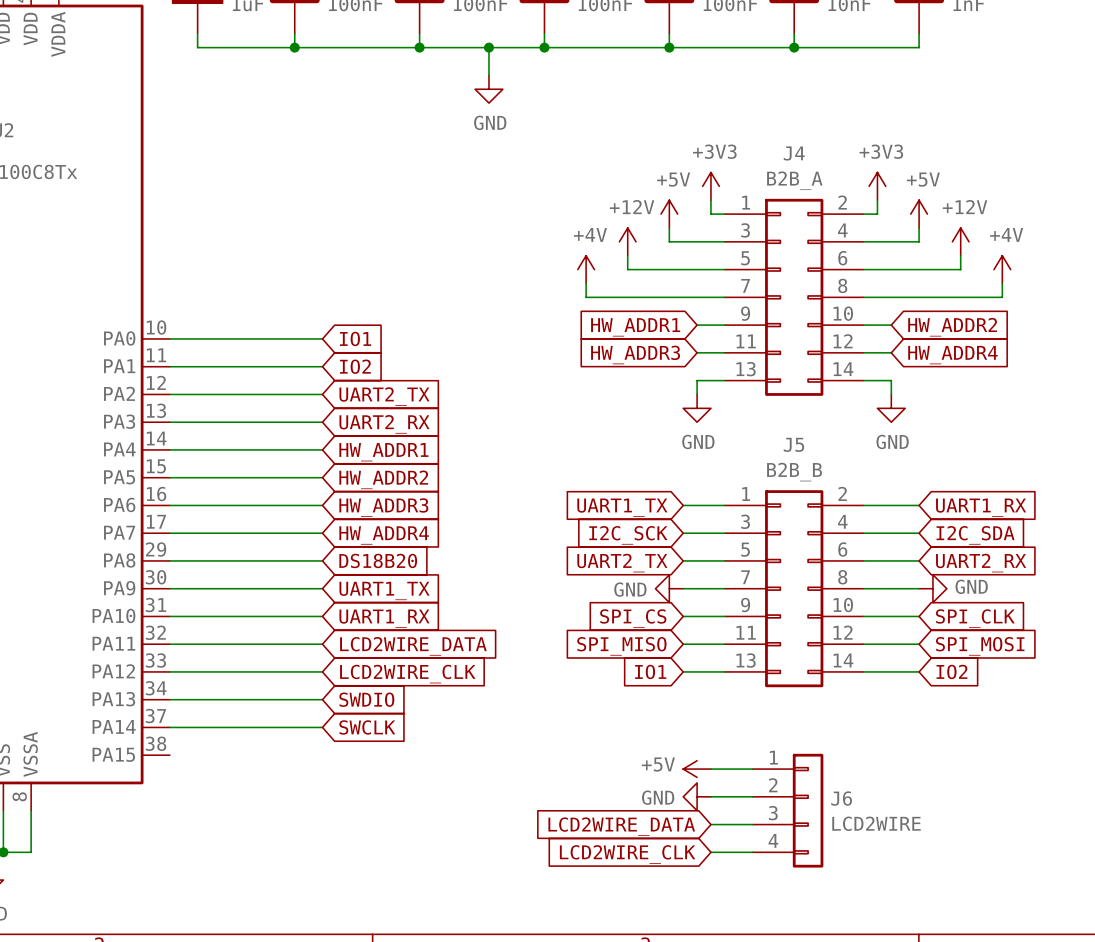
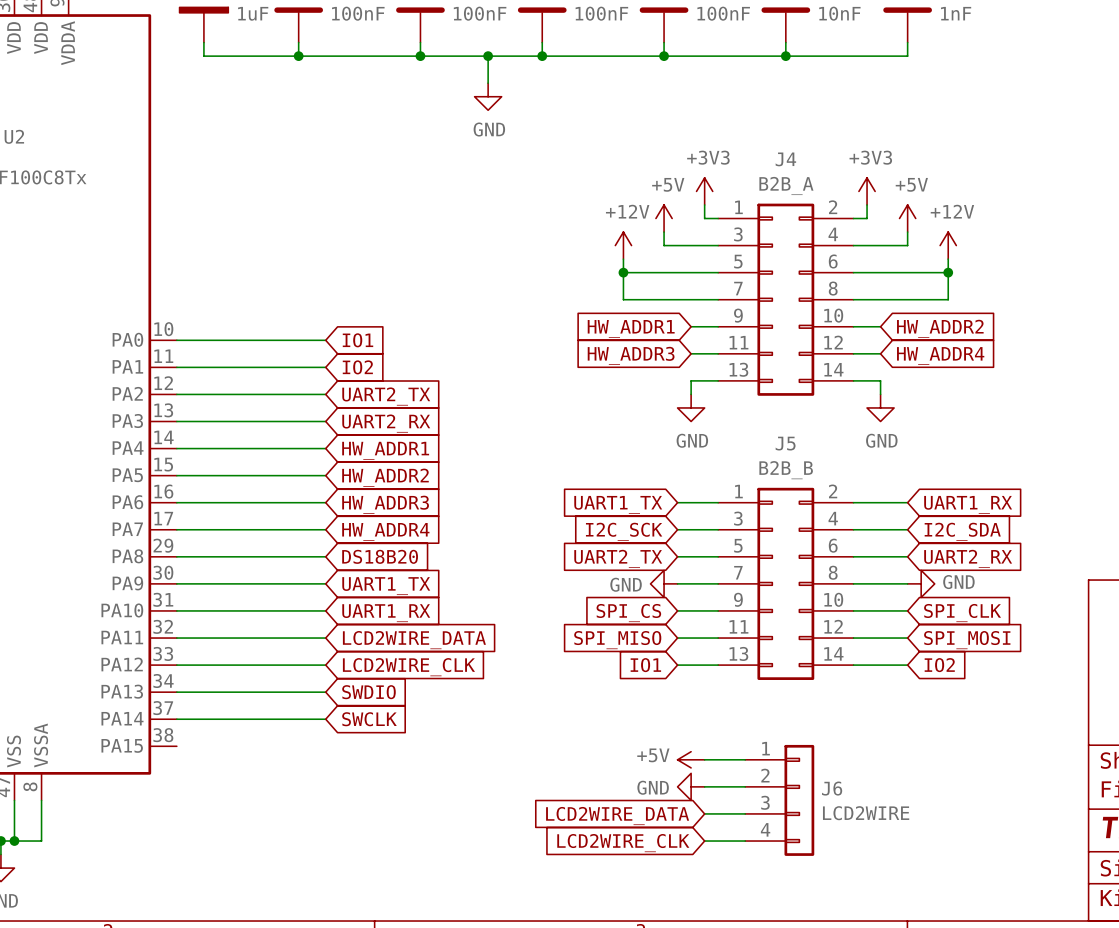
power symbol: +4V (586, 269) -> none
junction: none -> (623, 272)
junction: none -> (948, 272)
power symbol: +4V (1002, 269) -> none
wire: (586, 283) (586, 297) (627, 297) -> (623, 272) (623, 299)
wire: (1002, 283) (1002, 297) (960, 297) -> (948, 272) (948, 299)

